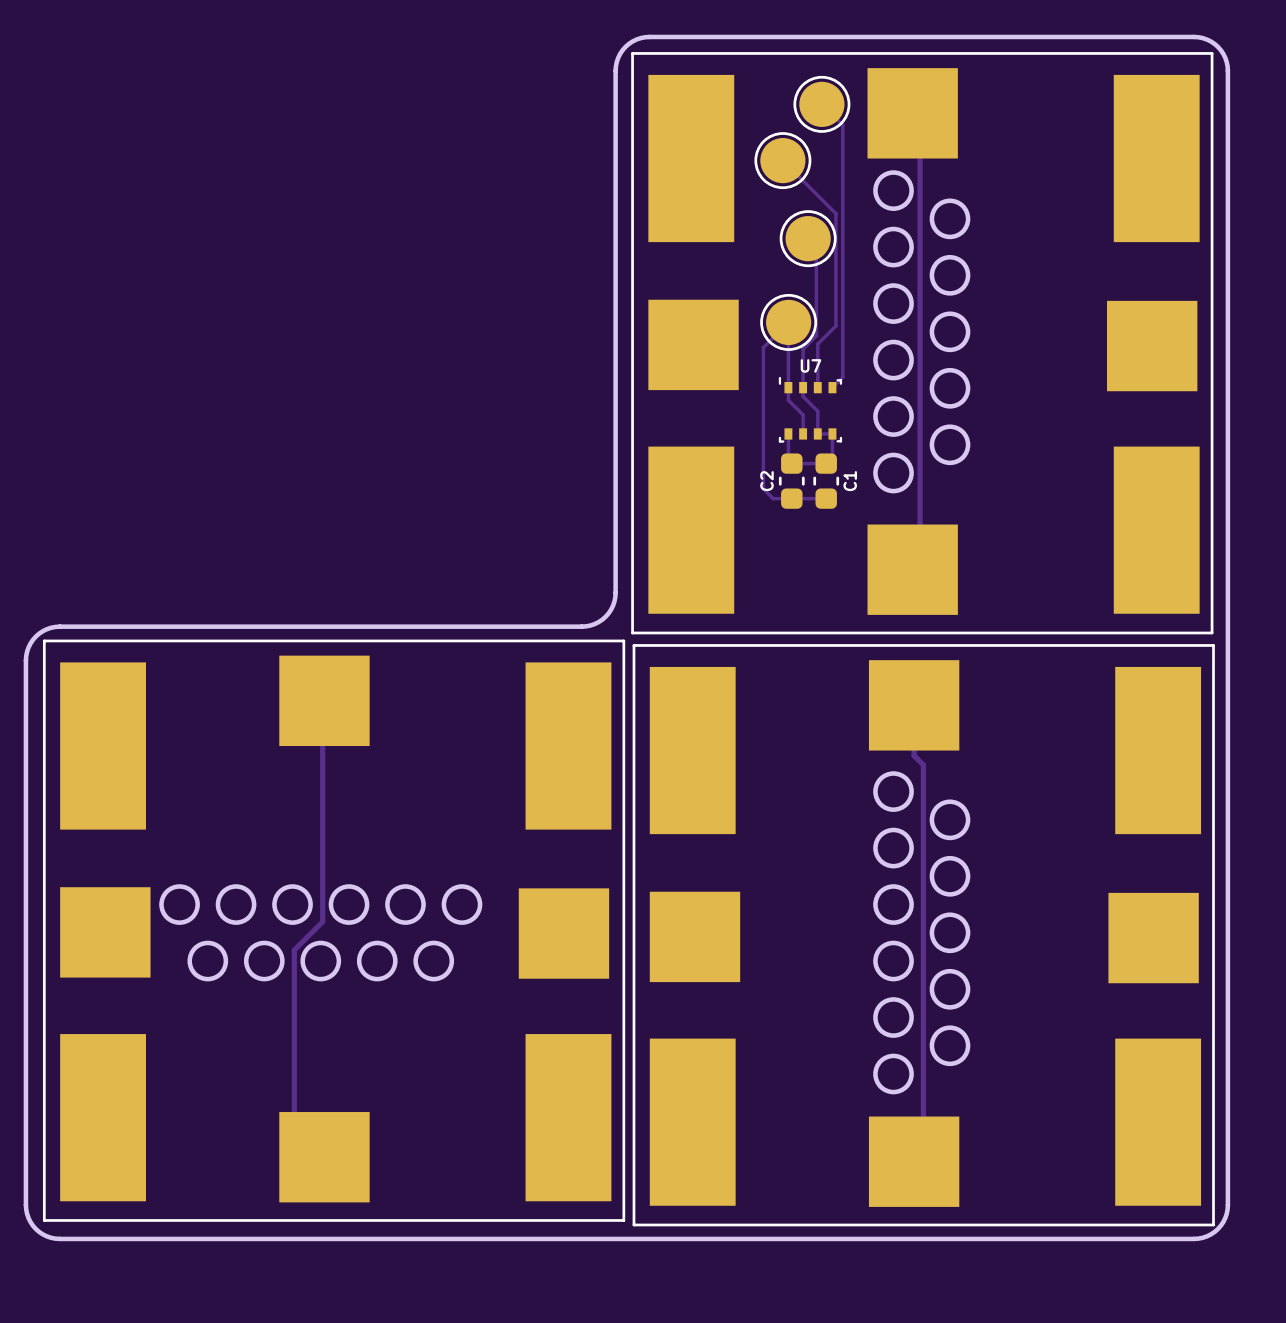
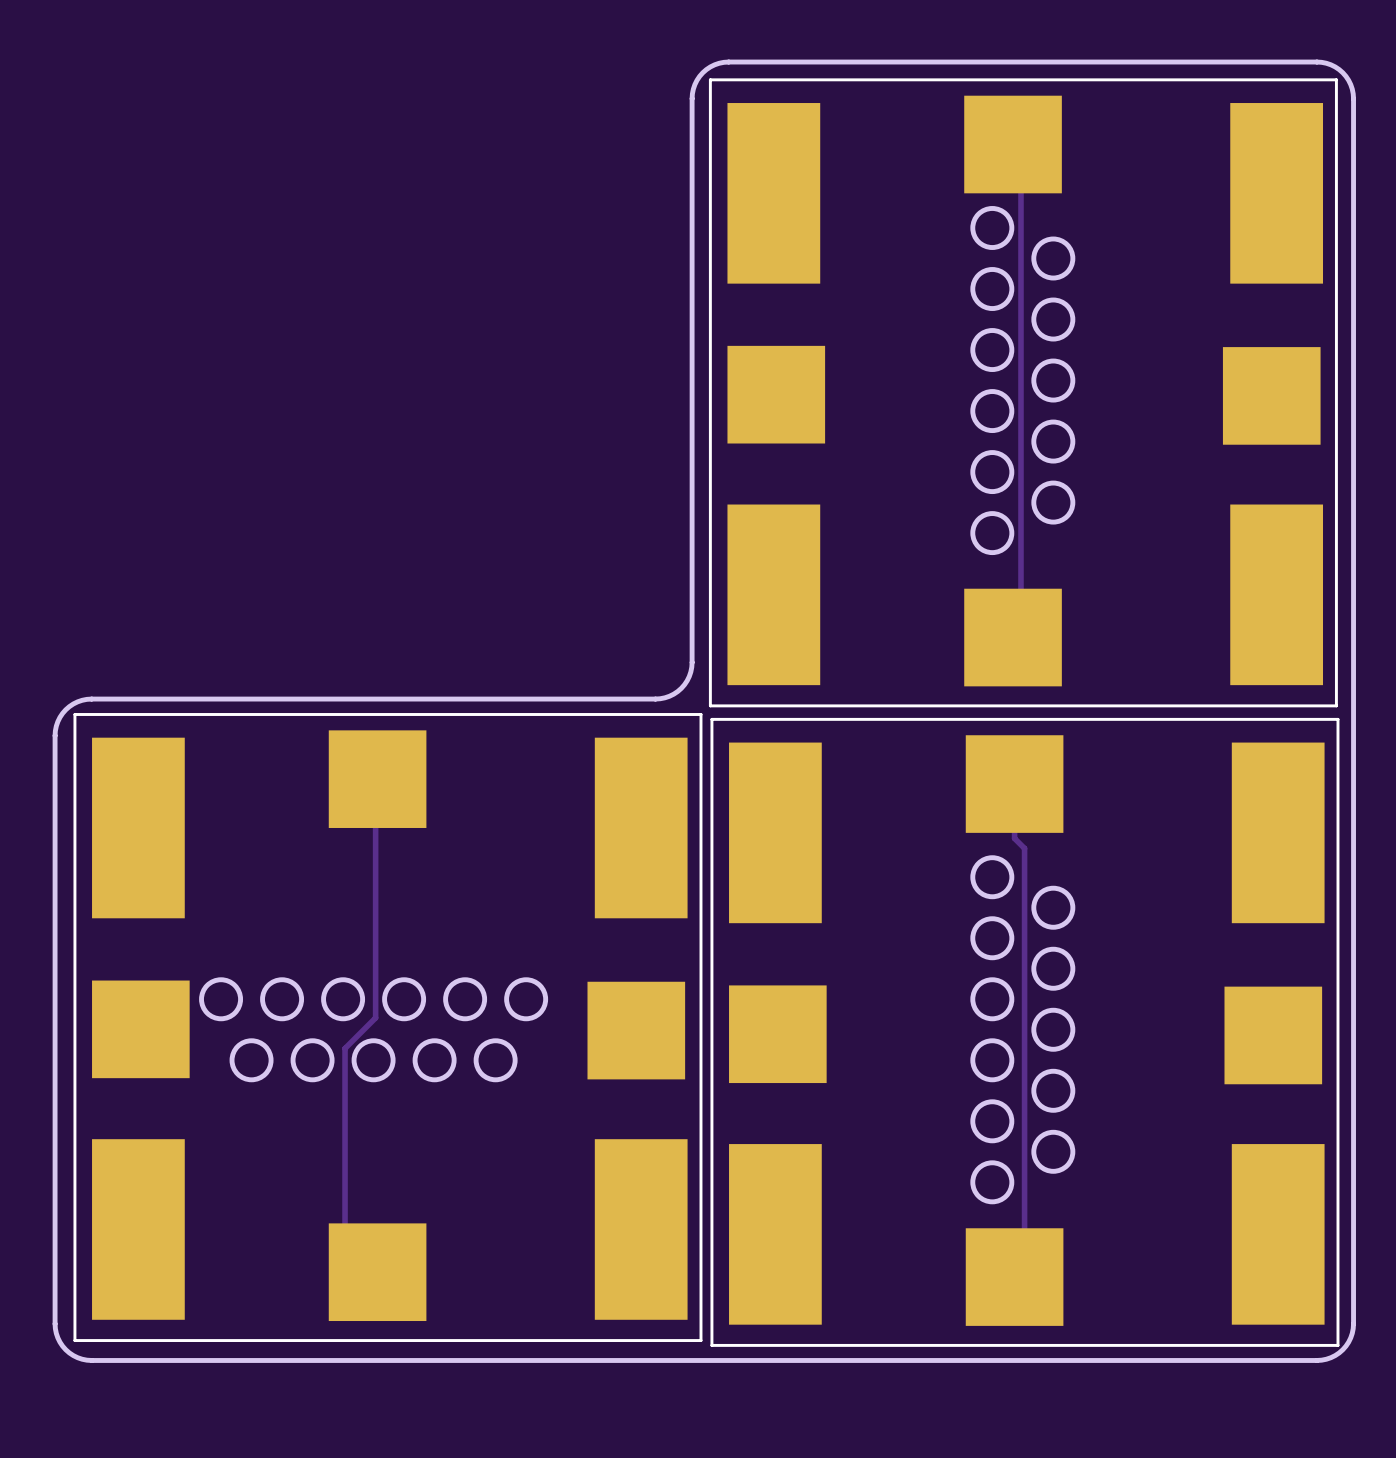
track: (821, 104) (842, 125) (842, 377) (832, 387) -> none
part: (821, 104) -> none
track: (782, 160) (835, 213) (835, 325) (817, 344) (817, 387) -> none
part: (782, 160) -> none
track: (808, 238) (816, 246) (816, 335) (803, 349) (803, 396) (817, 411) (817, 433) (832, 433) (832, 457) (826, 463) (791, 463) (788, 460) (788, 433) -> none
part: (808, 238) -> none
track: (788, 322) (763, 347) (763, 488) (773, 498) (826, 498) -> none
track: (788, 322) (788, 400) (803, 414) (803, 433) -> none
part: (788, 322) -> none
U7: (810, 409) -> none
C2: (791, 481) -> none
C1: (826, 481) -> none

